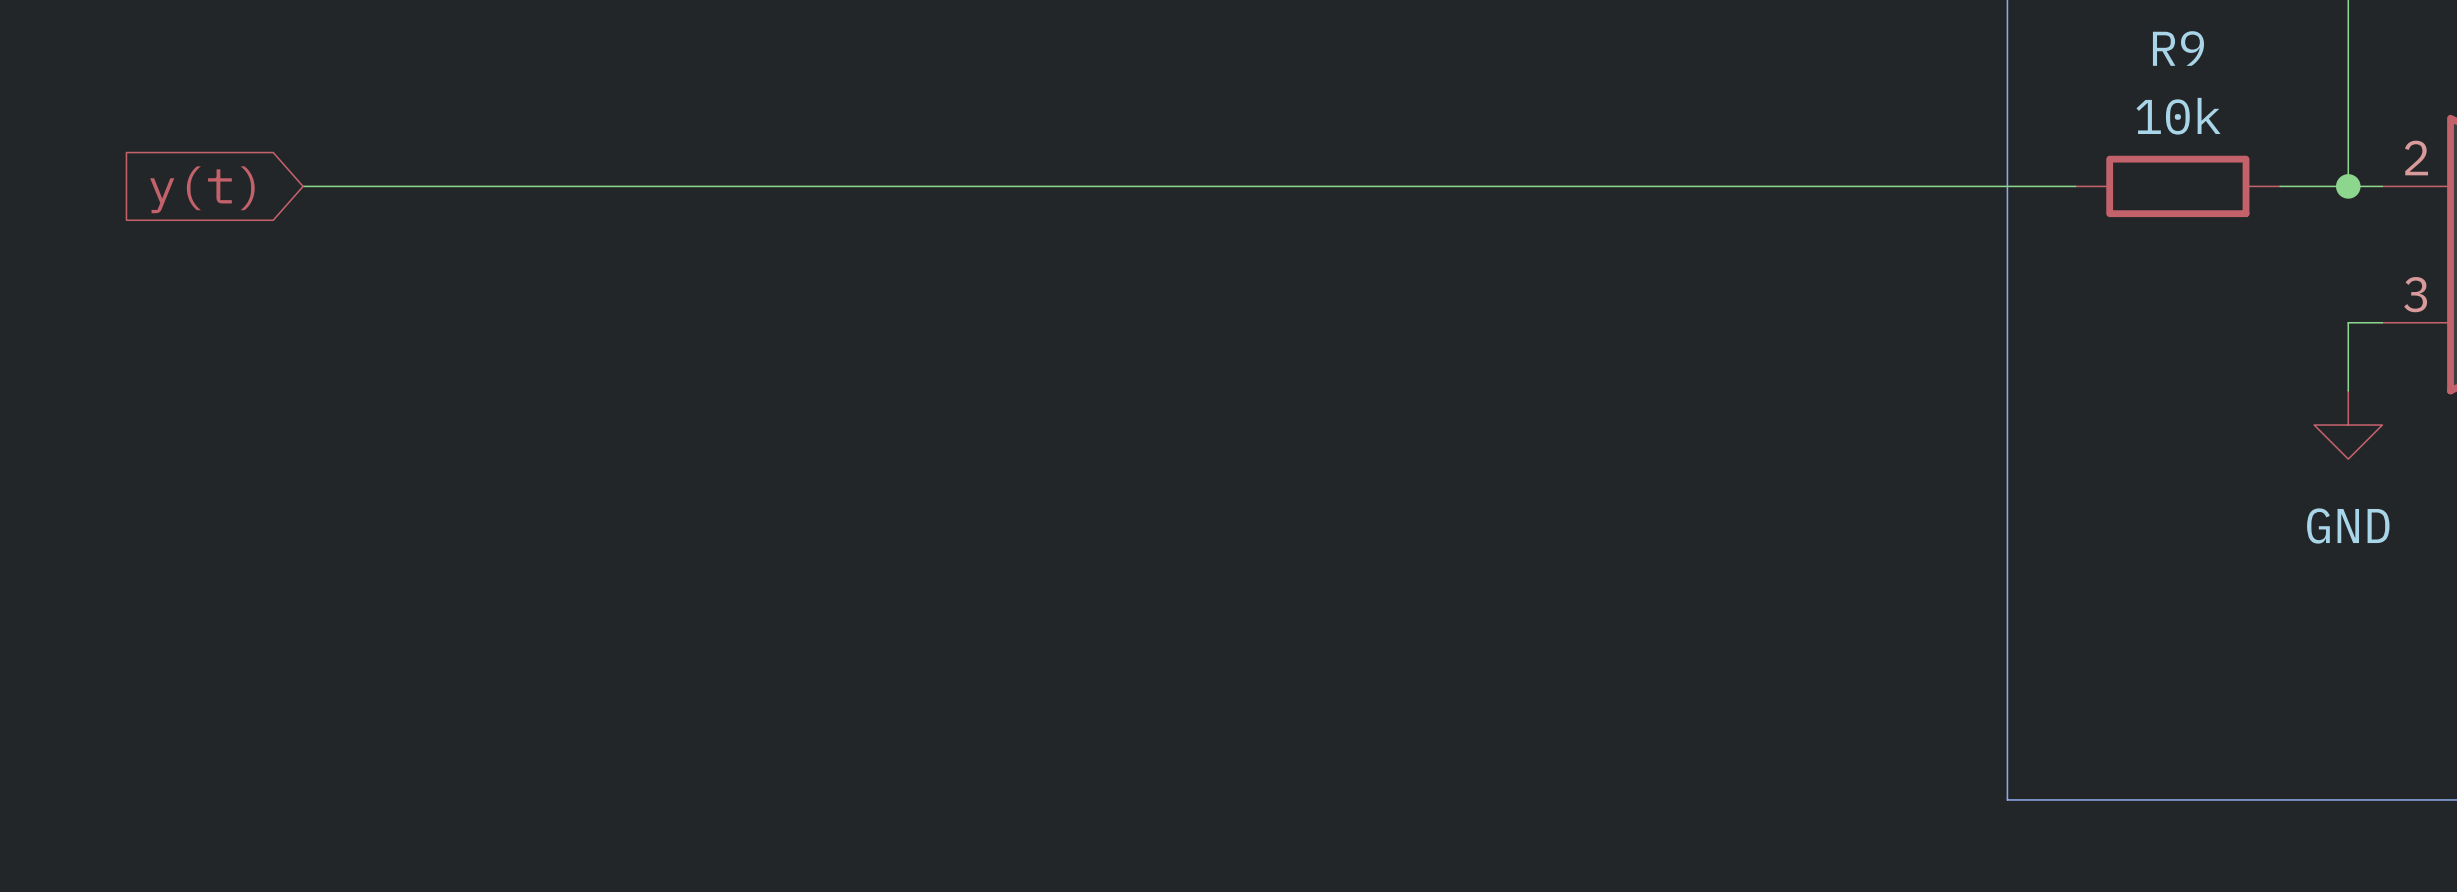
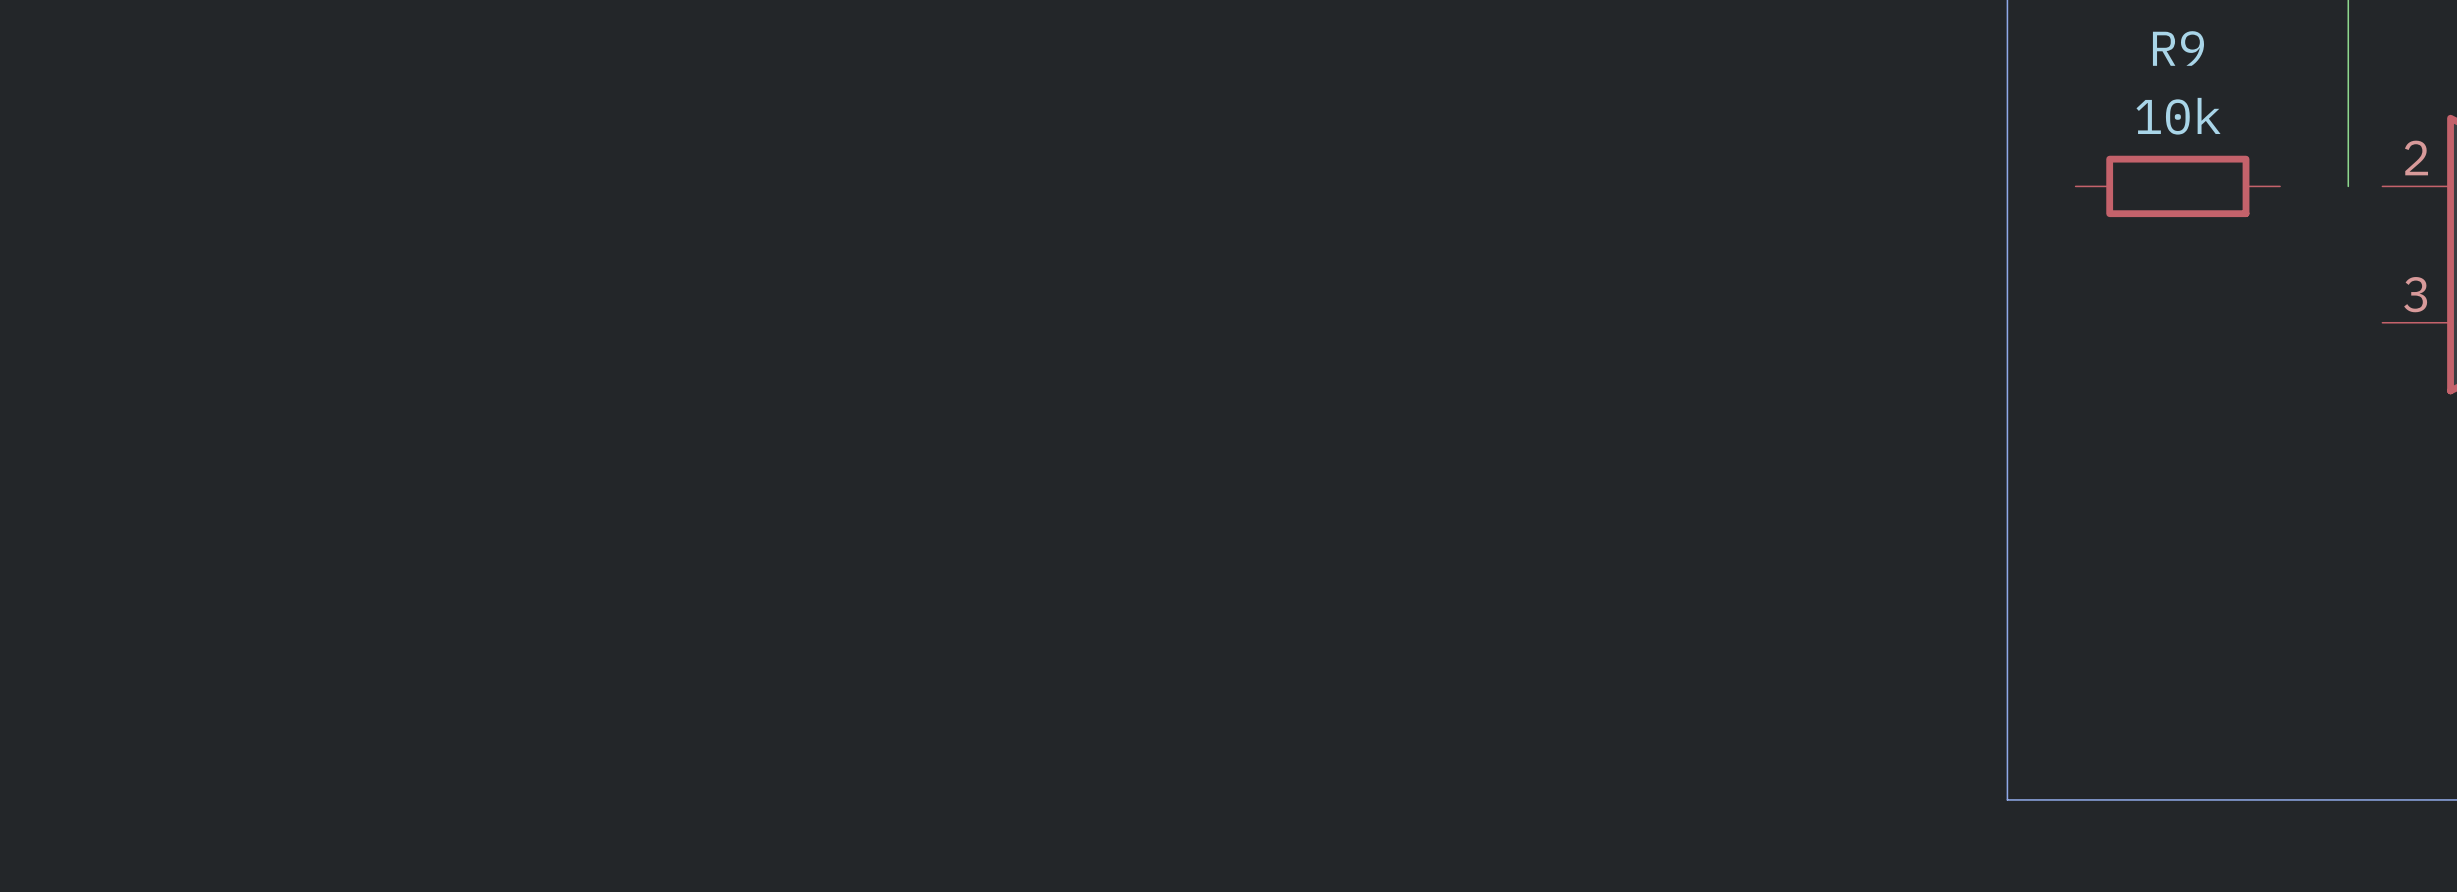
wire: (303, 186) (2075, 186) -> none
wire: (2280, 186) (2382, 186) -> none
junction: (2348, 186) -> none
global label: y(t) (202, 189) -> none
wire: (2382, 322) (2348, 322) (2348, 390) -> none
power symbol: GND (2348, 425) -> none

